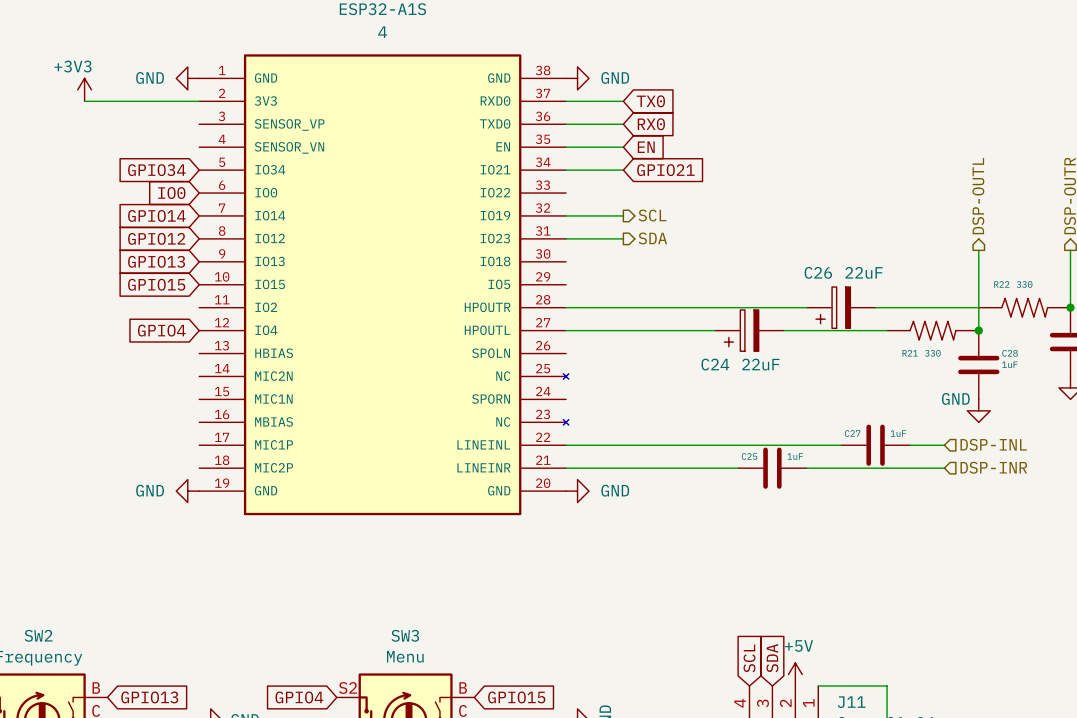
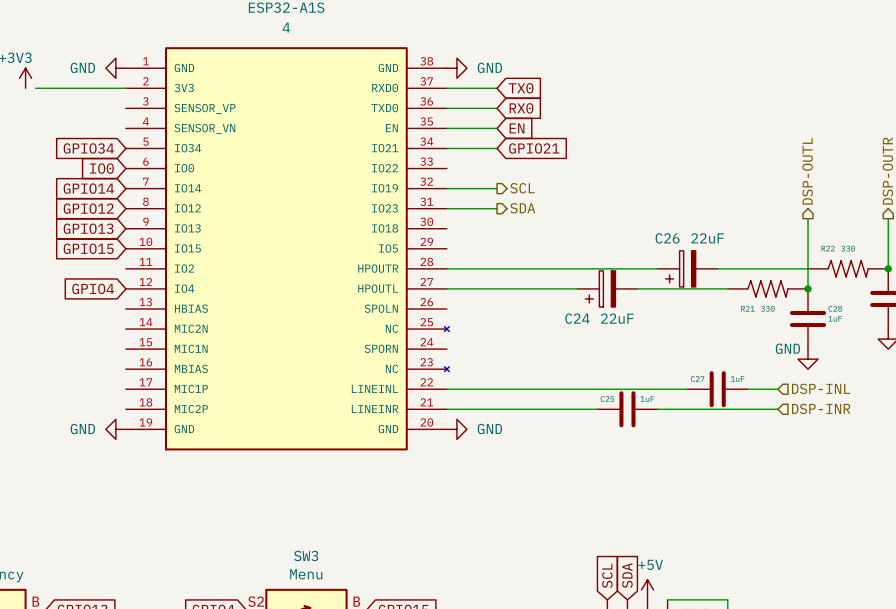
wire: (84, 101) (96, 101) -> none

